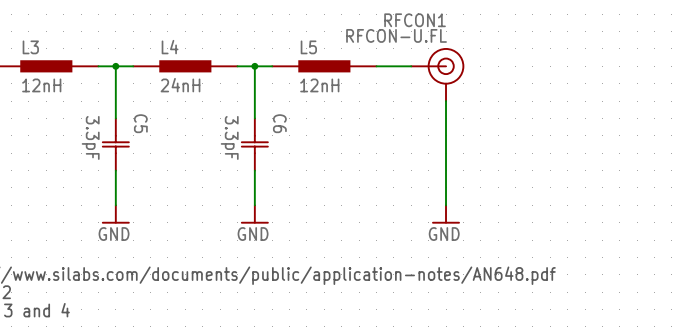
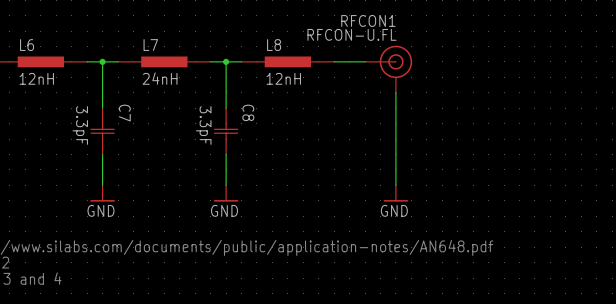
L3 name: L3 (30, 47) -> L6 (27, 45)
L4 name: L4 (170, 47) -> L7 (150, 45)
L5 name: L5 (308, 47) -> L8 (274, 45)
C5 name: C5 (140, 123) -> C7 (124, 113)
C6 name: C6 (279, 123) -> C8 (248, 112)

